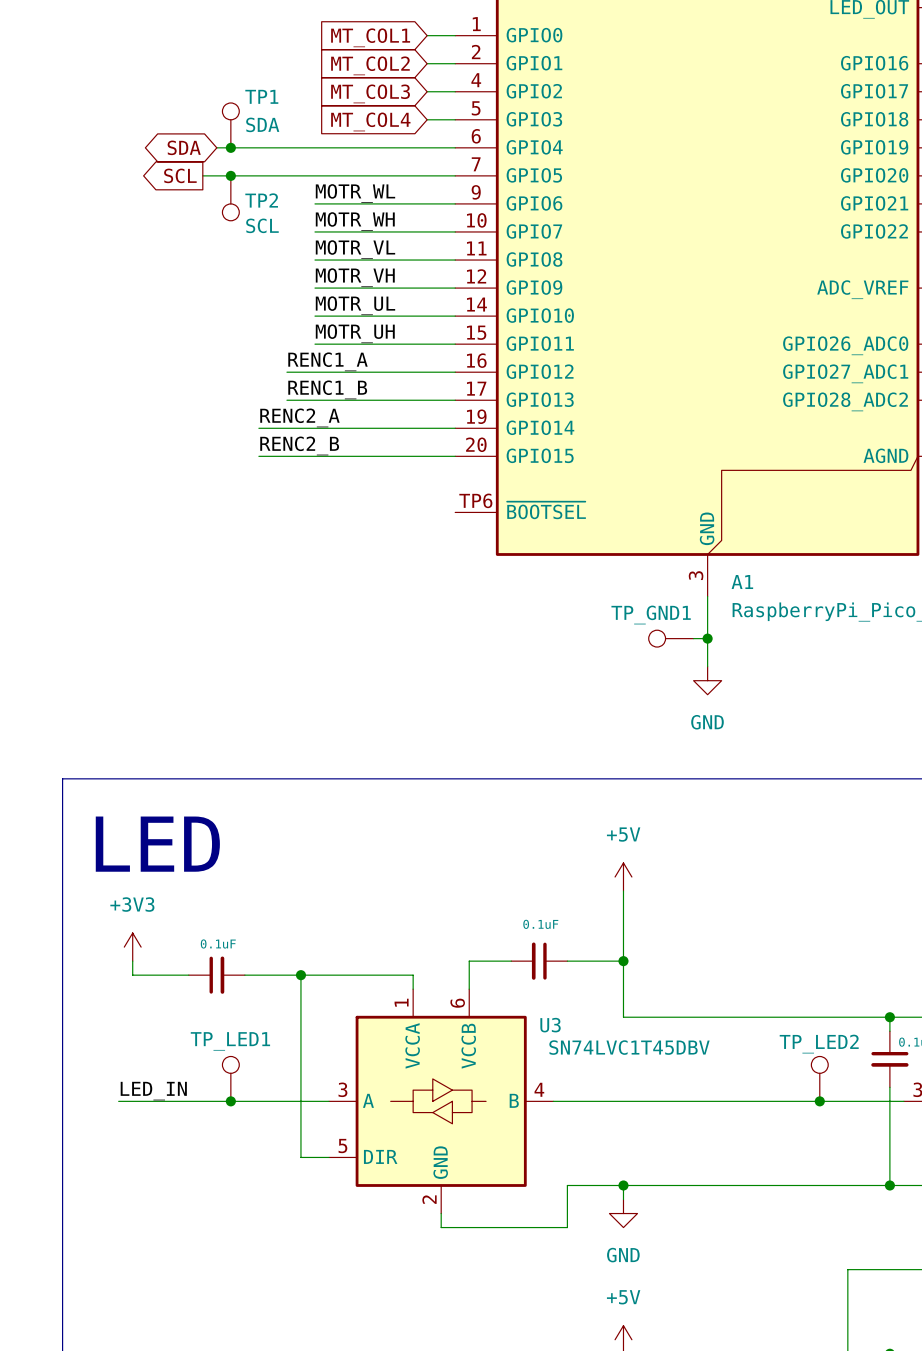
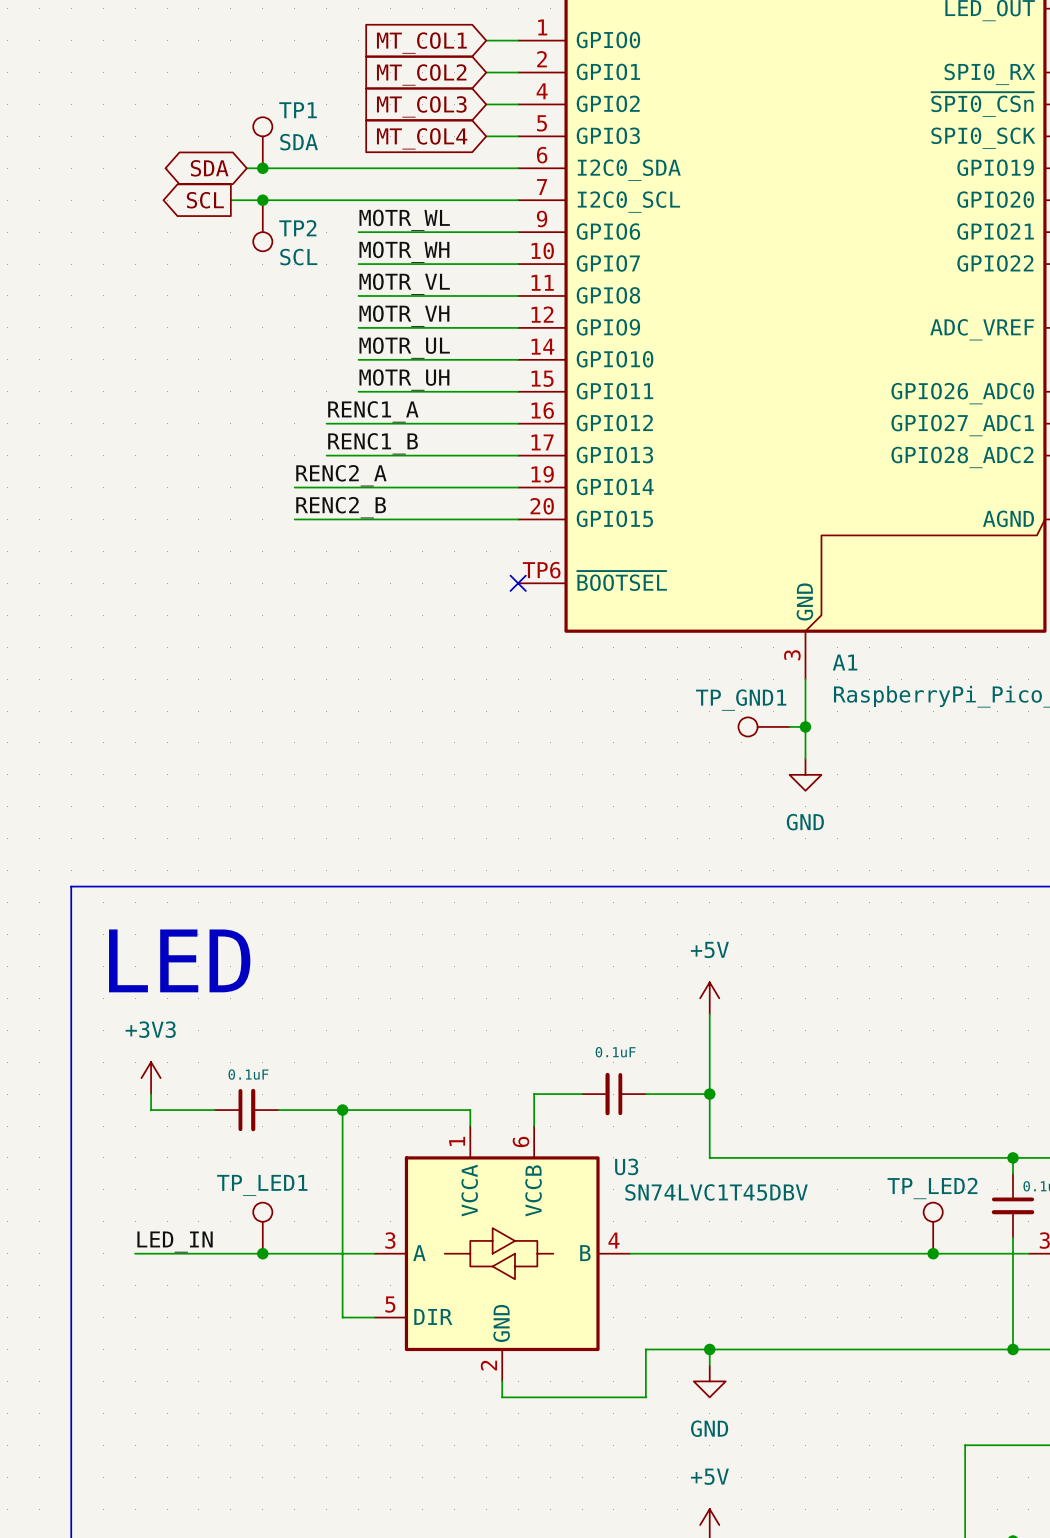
A1 pin name: GPIO16 (874, 63) -> SPI0_RX (989, 74)
A1 pin name: GPIO17 (874, 91) -> ~{SPI0_CSn} (982, 104)
A1 pin name: GPIO18 (874, 119) -> SPI0_SCK (983, 138)
A1 pin name: GPIO4 (534, 147) -> I2C0_SDA (629, 170)
A1 pin name: GPIO5 (534, 175) -> I2C0_SCL (628, 202)
no-connect mark: none -> (518, 583)

